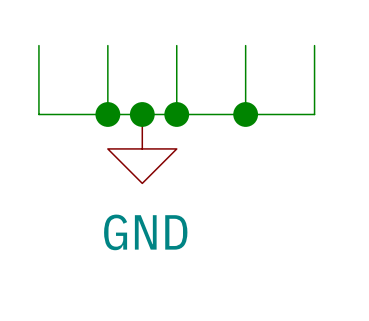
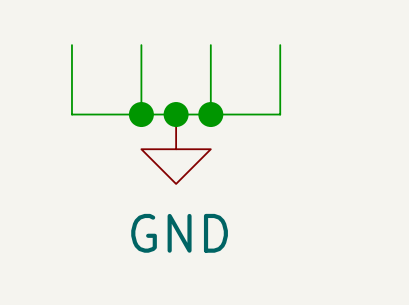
wire: (314, 45) (314, 114) (245, 114) -> none
junction: (245, 114) -> none

